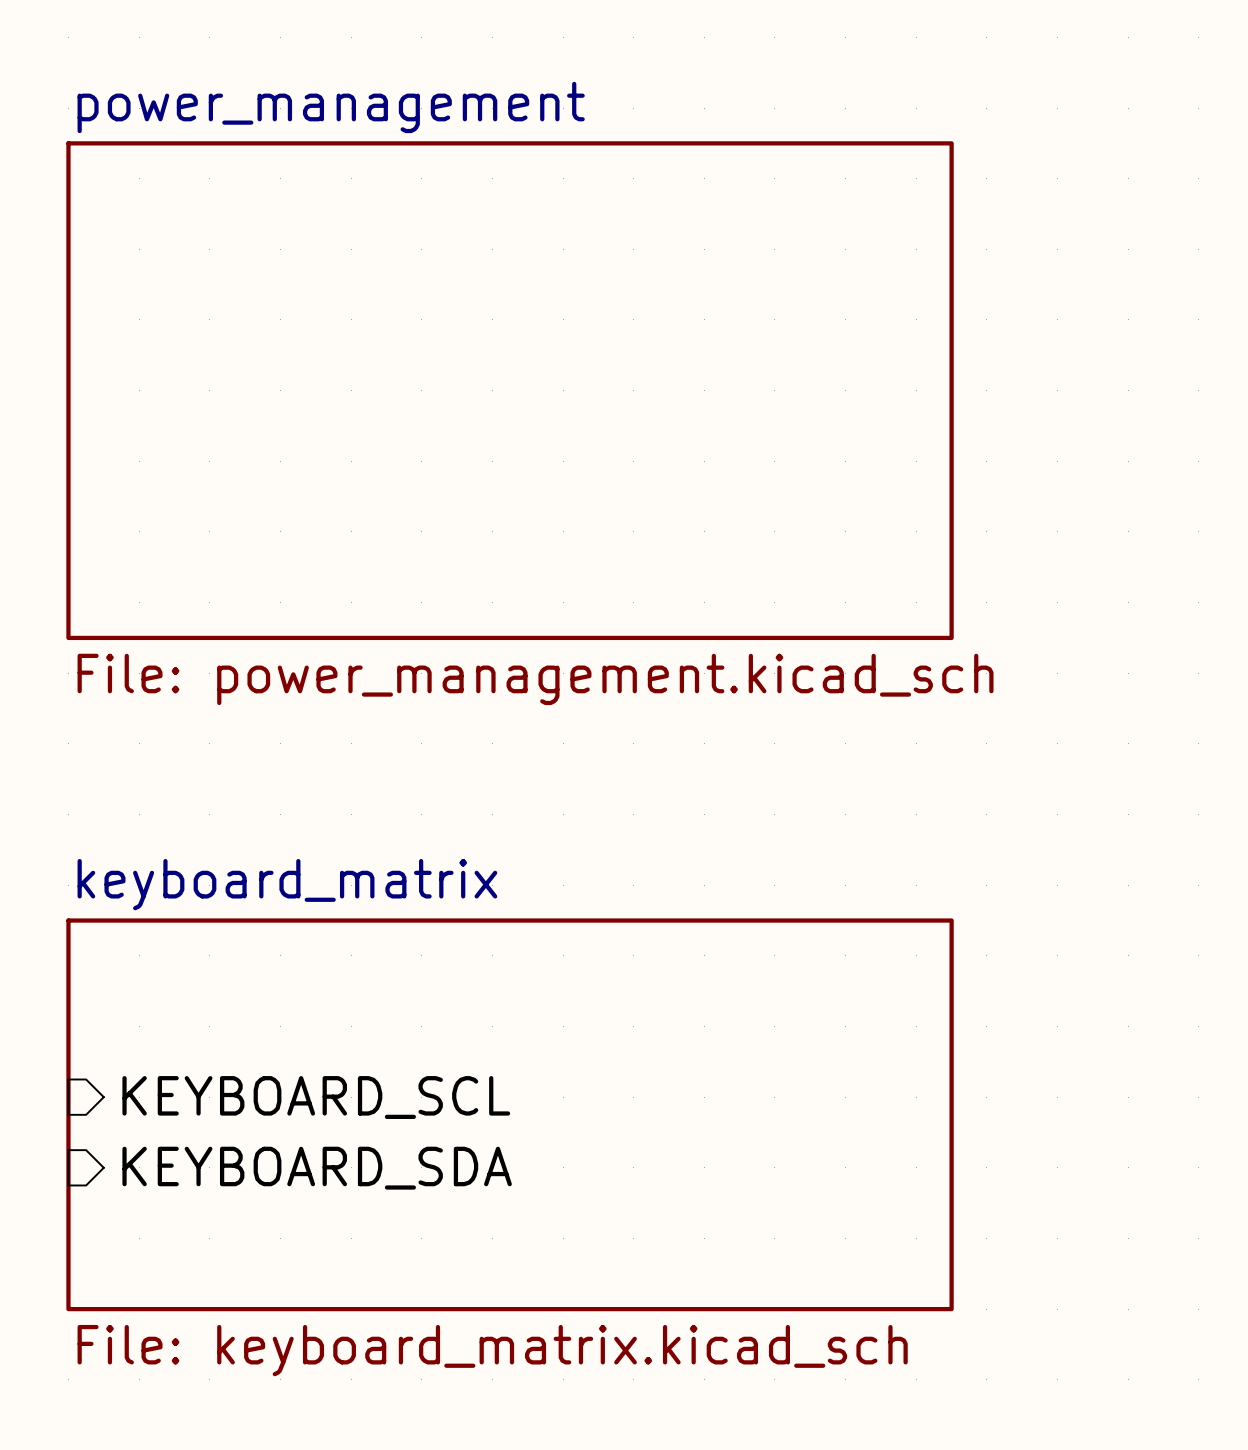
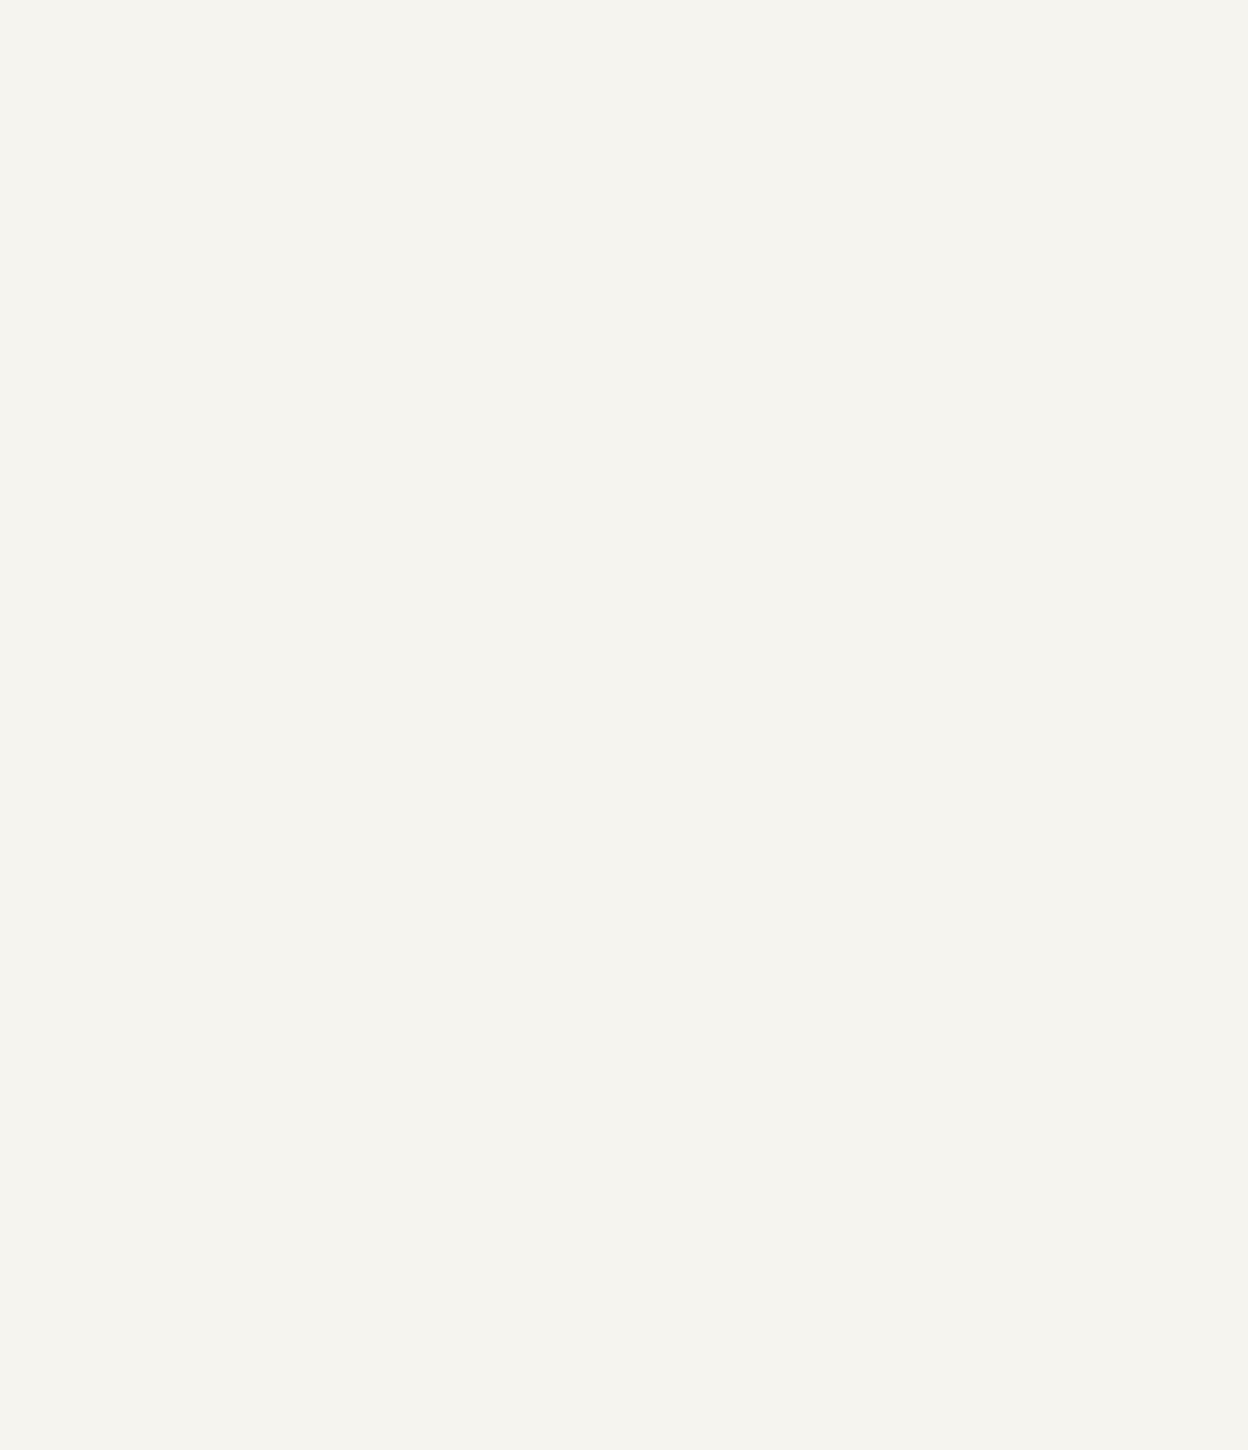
sheet power_management: File: power_management.kicad_sch (510, 390) -> none
sheet pin: KEYBOARD_SCL (316, 1097) -> none
sheet keyboard_matrix: File: keyboard_matrix.kicad_sch (510, 1114) -> none
sheet pin: KEYBOARD_SDA (317, 1168) -> none

